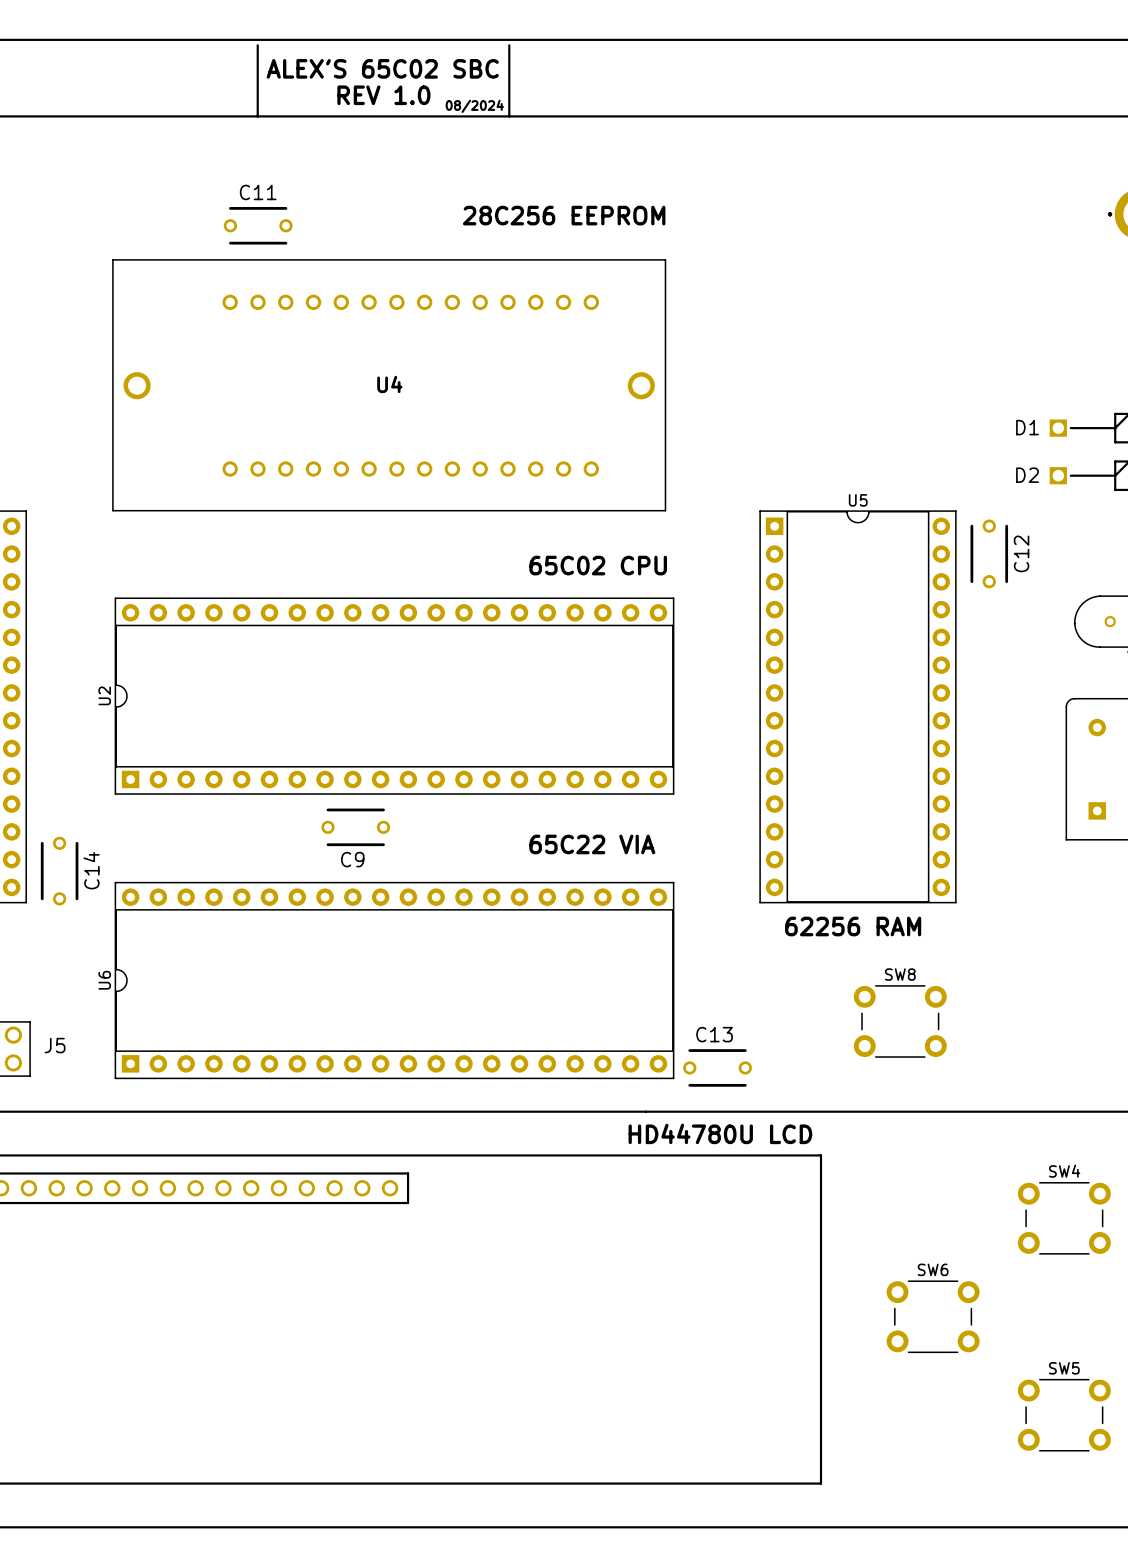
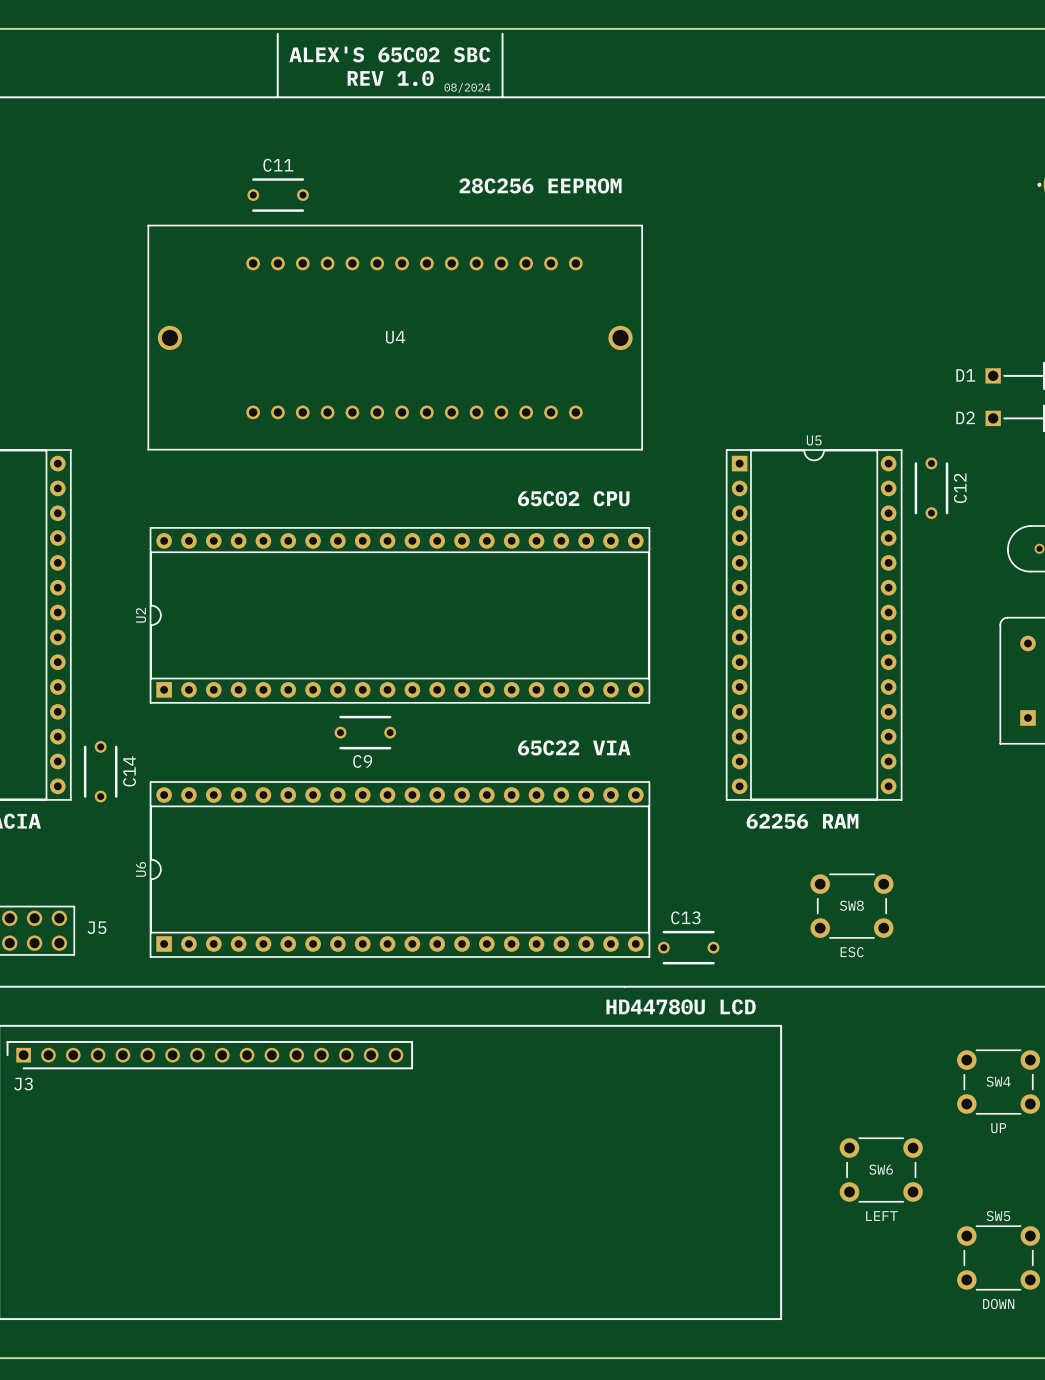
SW8 name position: SW8 (900, 974) -> SW8 (851, 905)
SW8 value: none -> ESC (852, 952)
SW4 name position: SW4 (1064, 1171) -> SW4 (998, 1081)
SW6 name position: SW6 (933, 1269) -> SW6 (881, 1169)
SW4 value: none -> UP (998, 1128)
SW6 value: none -> LEFT (881, 1216)
SW5 value: none -> DOWN (998, 1304)

